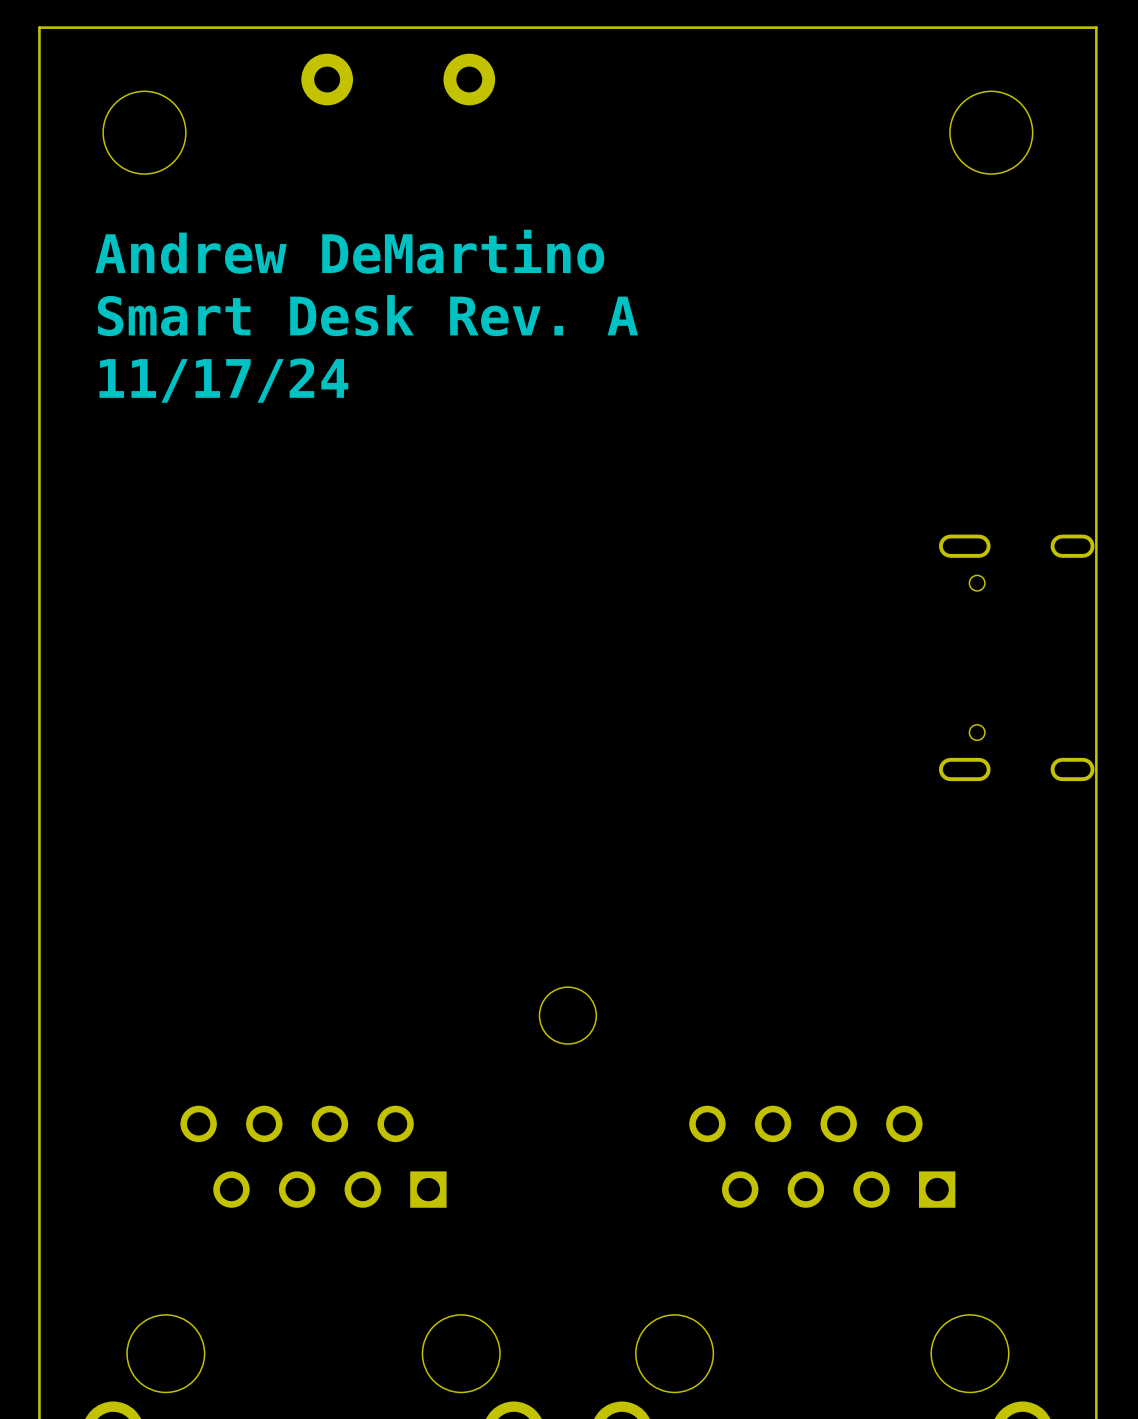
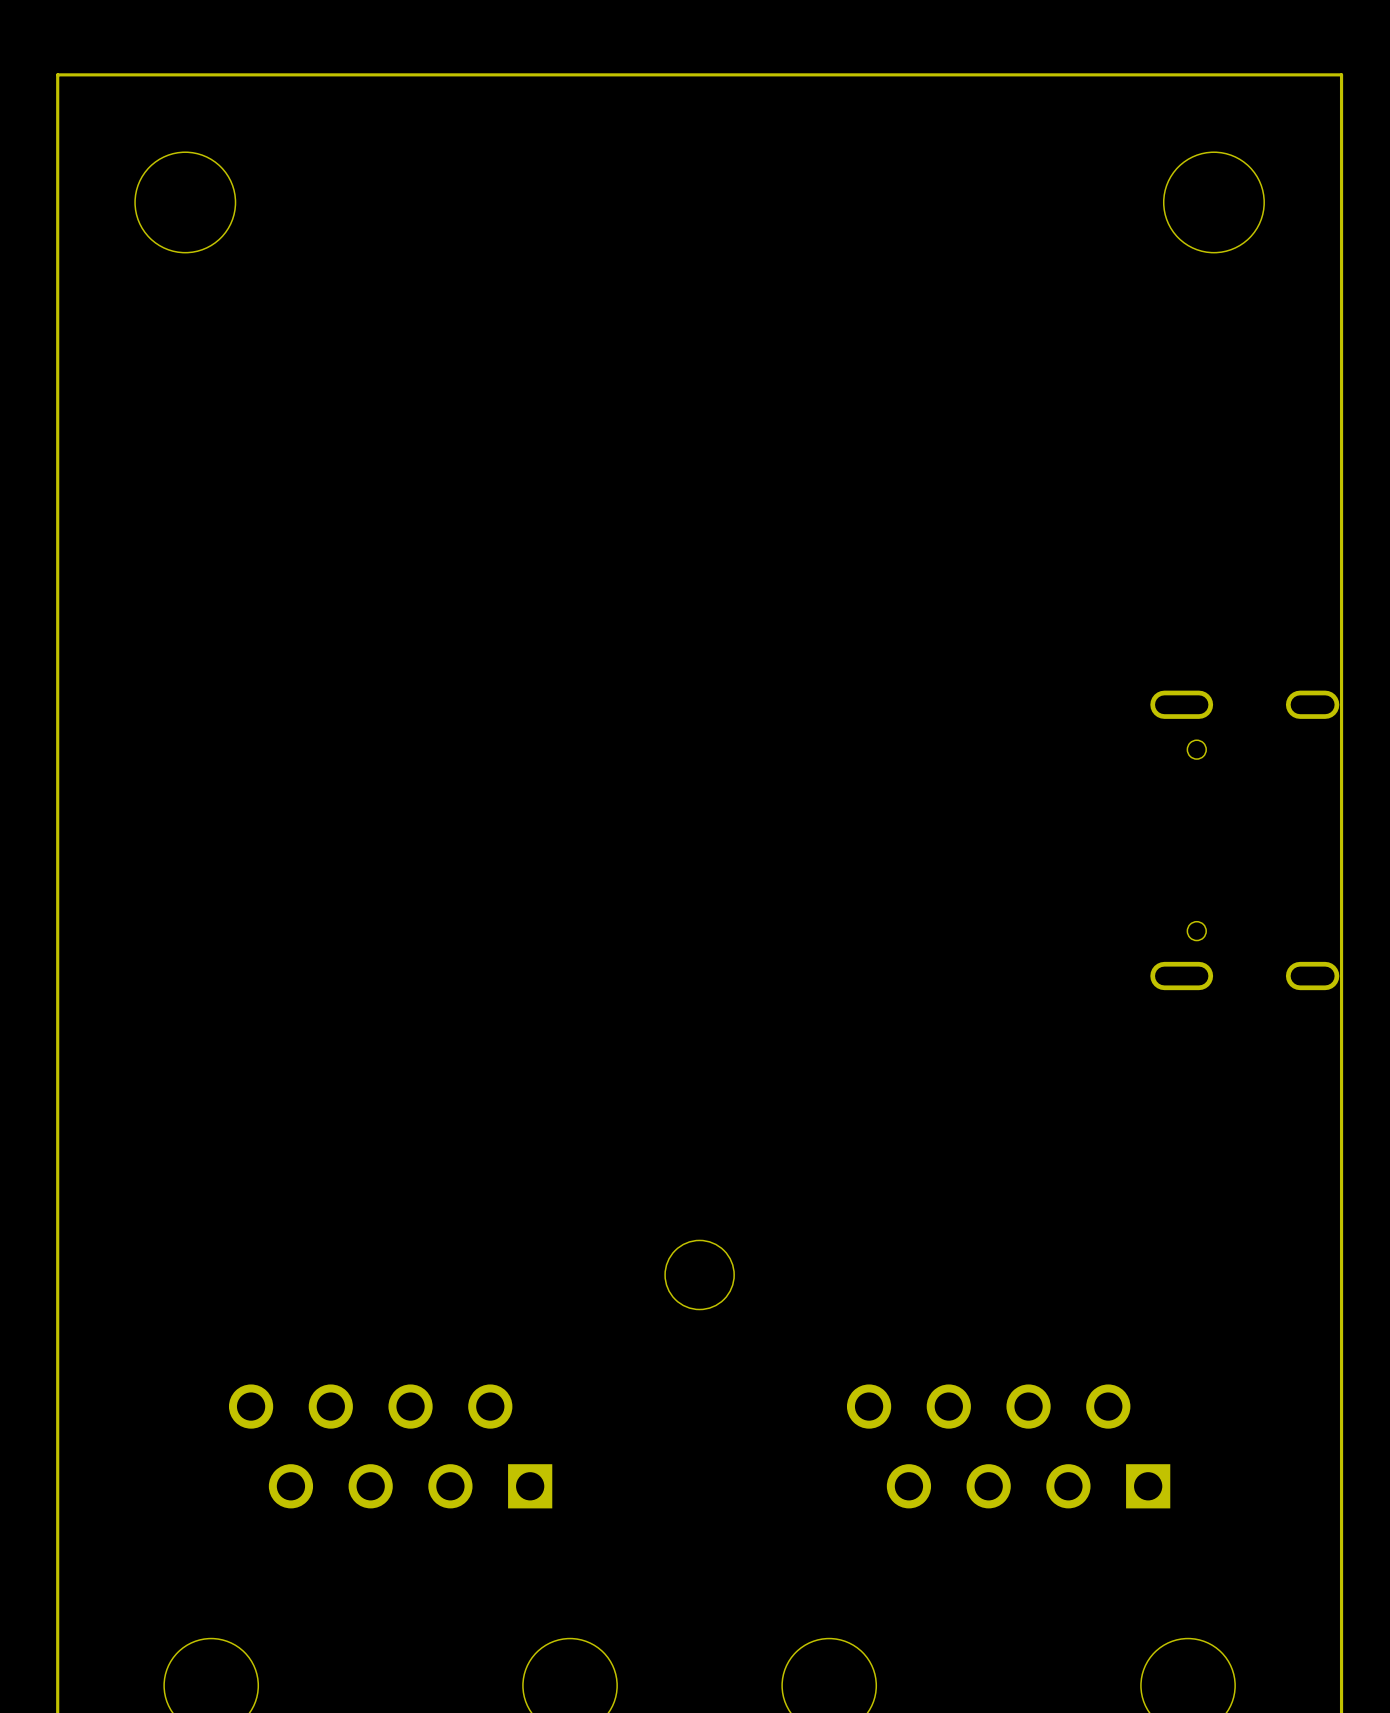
part: (327, 79) -> none
part: (469, 79) -> none
text: Andrew DeMartino (349, 251) -> none
text: Smart Desk Rev. A (367, 315) -> none
text: 11/17/24 (223, 380) -> none

